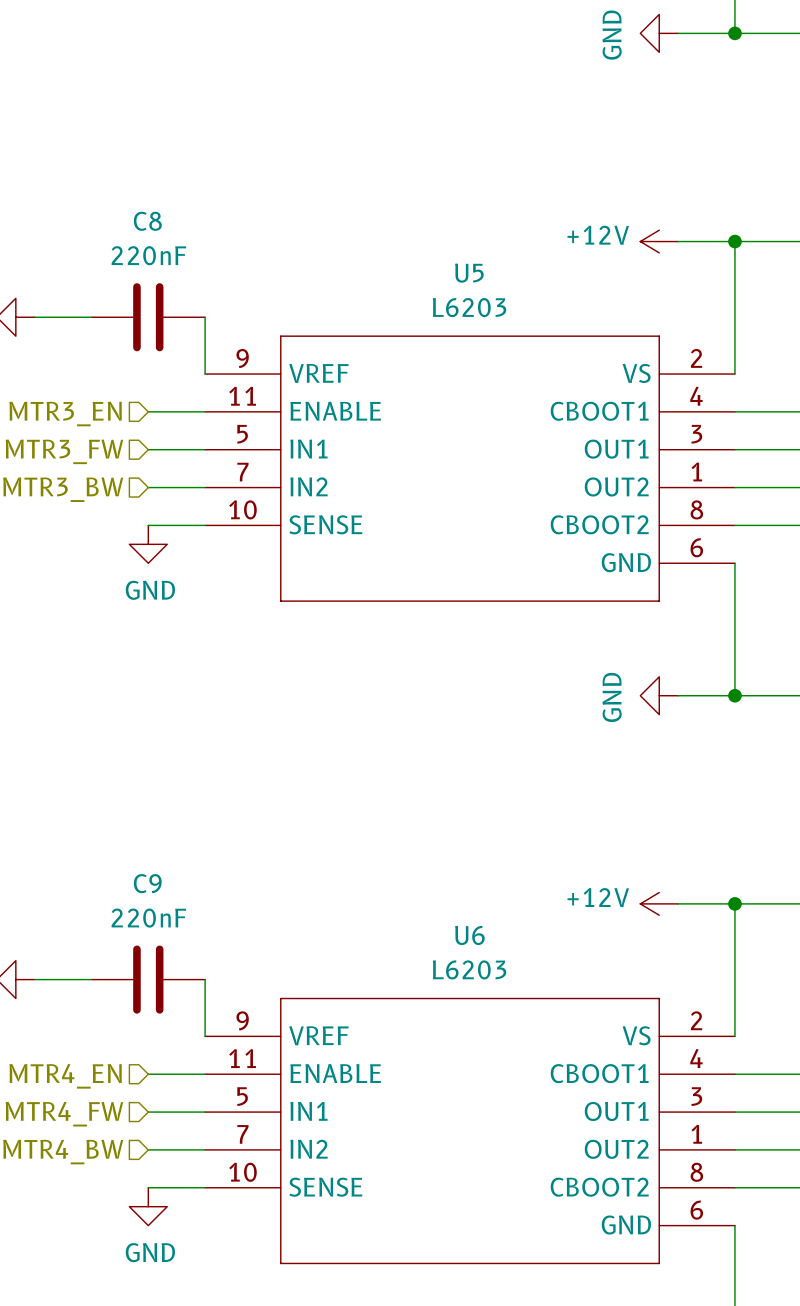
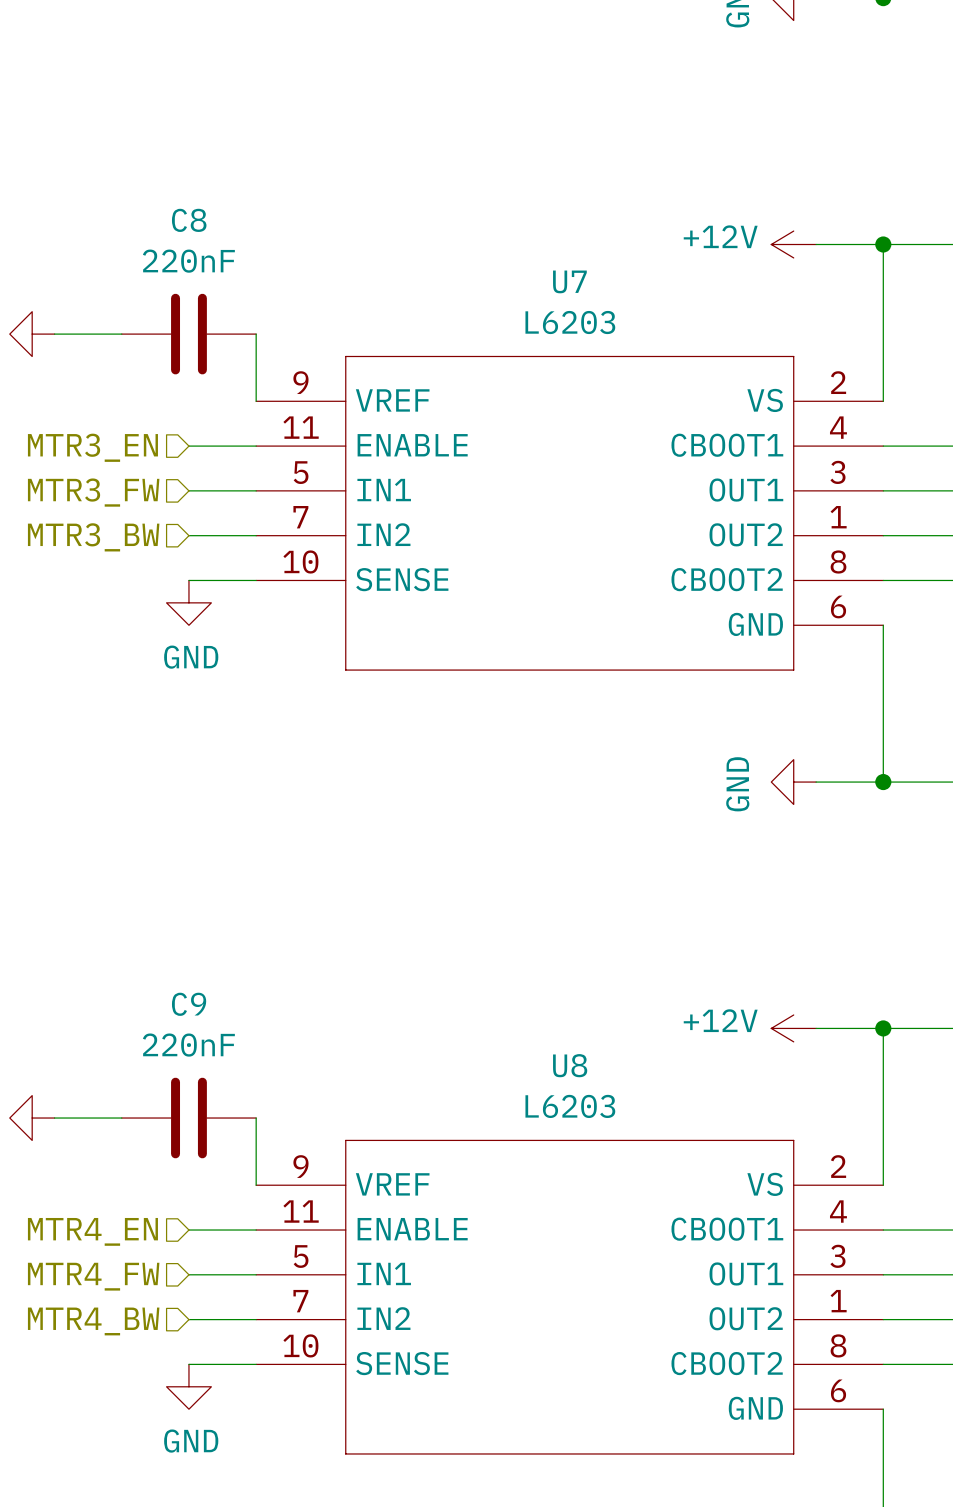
U5 name: U5 (469, 273) -> U7 (569, 281)
U6 name: U6 (469, 935) -> U8 (570, 1065)

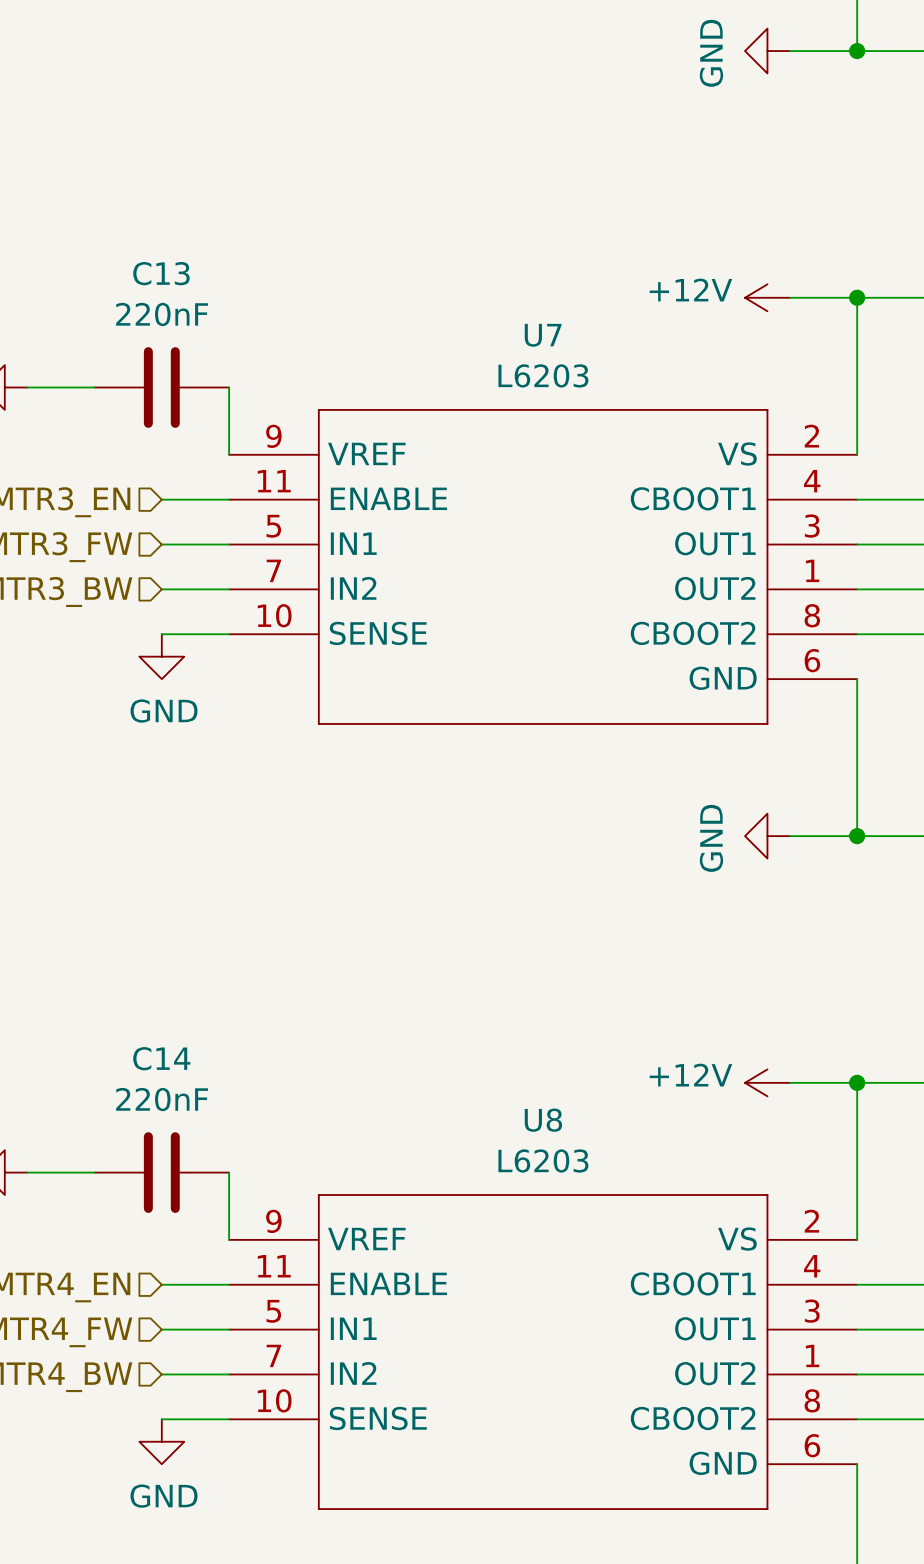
C8 name: C8 (189, 220) -> C13 (161, 273)
C9 name: C9 (189, 1004) -> C14 (161, 1058)

